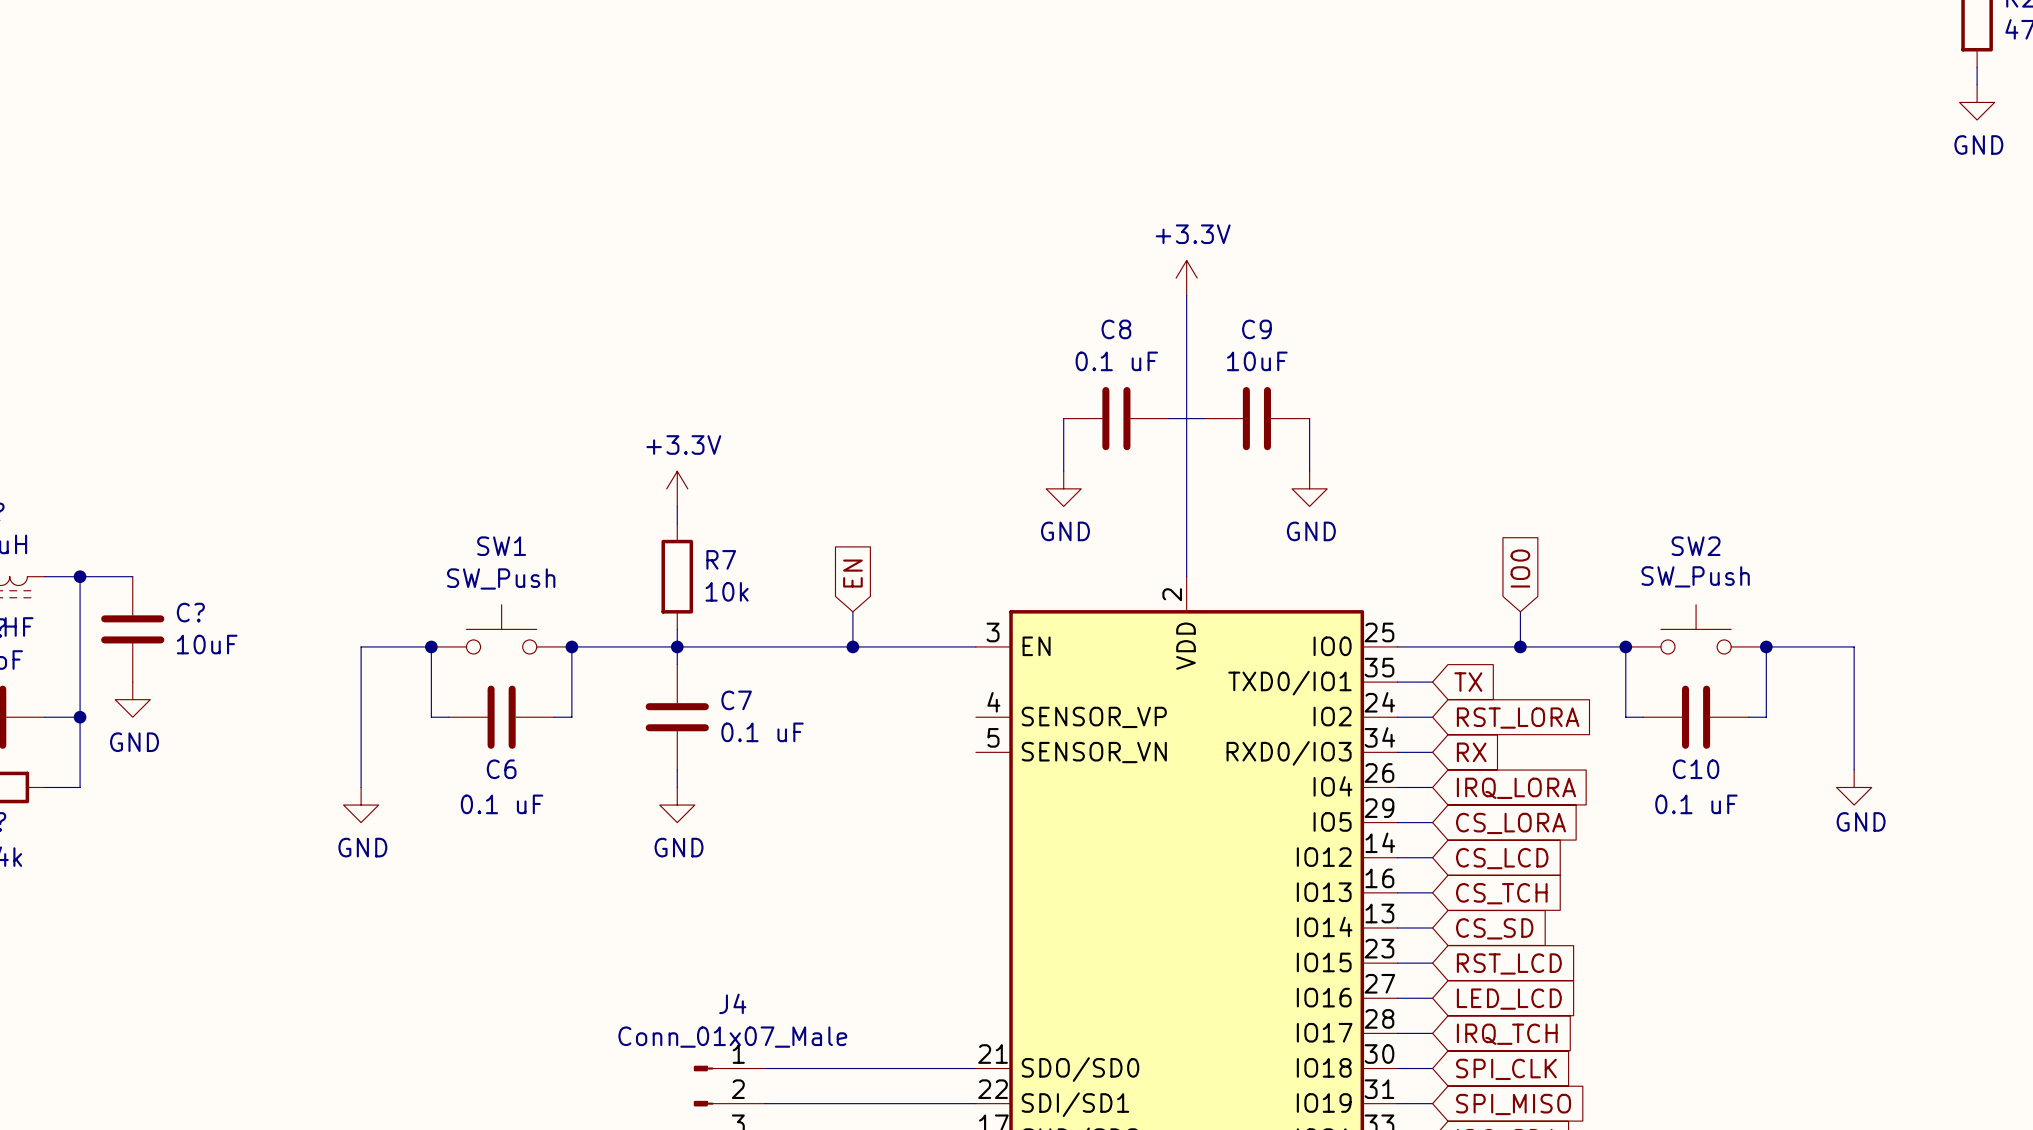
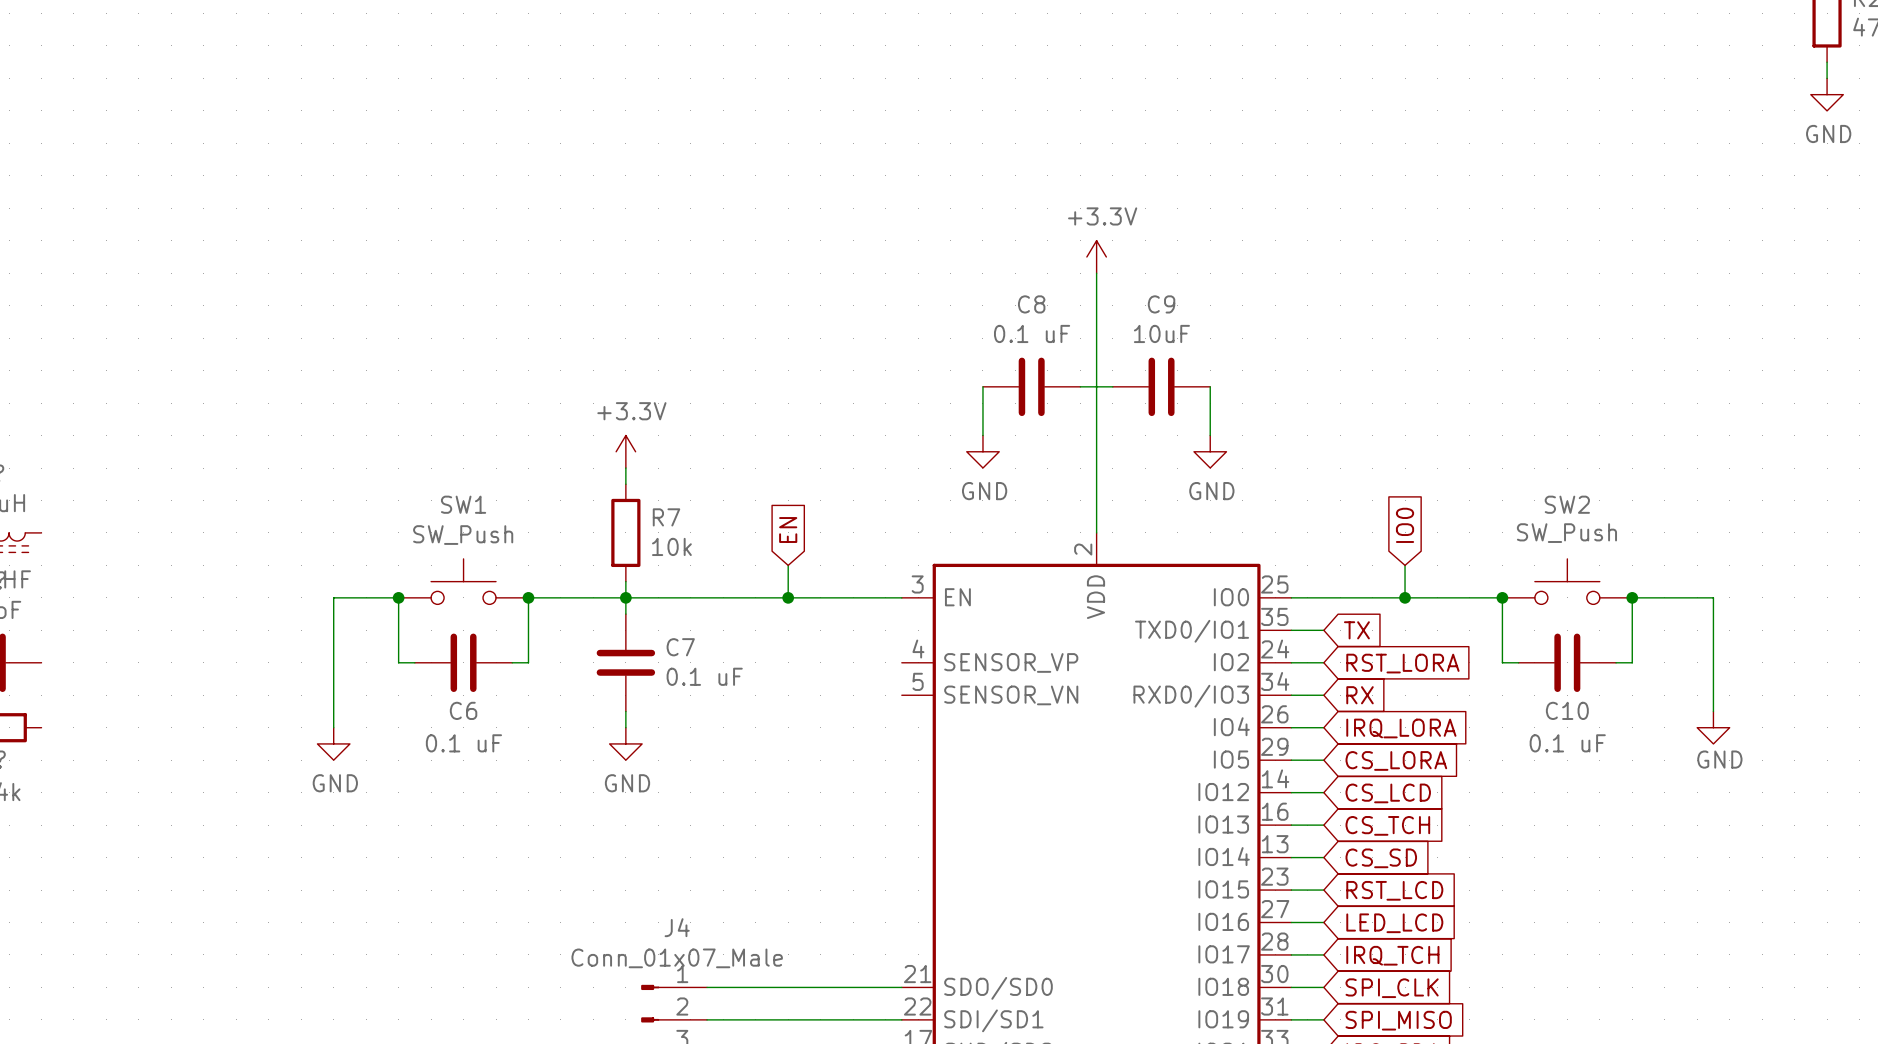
wire: (44, 576) (132, 576) -> none
wire: (80, 576) (80, 787) (44, 787) -> none
junction: (80, 576) -> none
C?: 10uF (132, 629) -> none
power symbol: GND (132, 699) -> none
wire: (44, 717) (80, 717) -> none
junction: (80, 717) -> none

